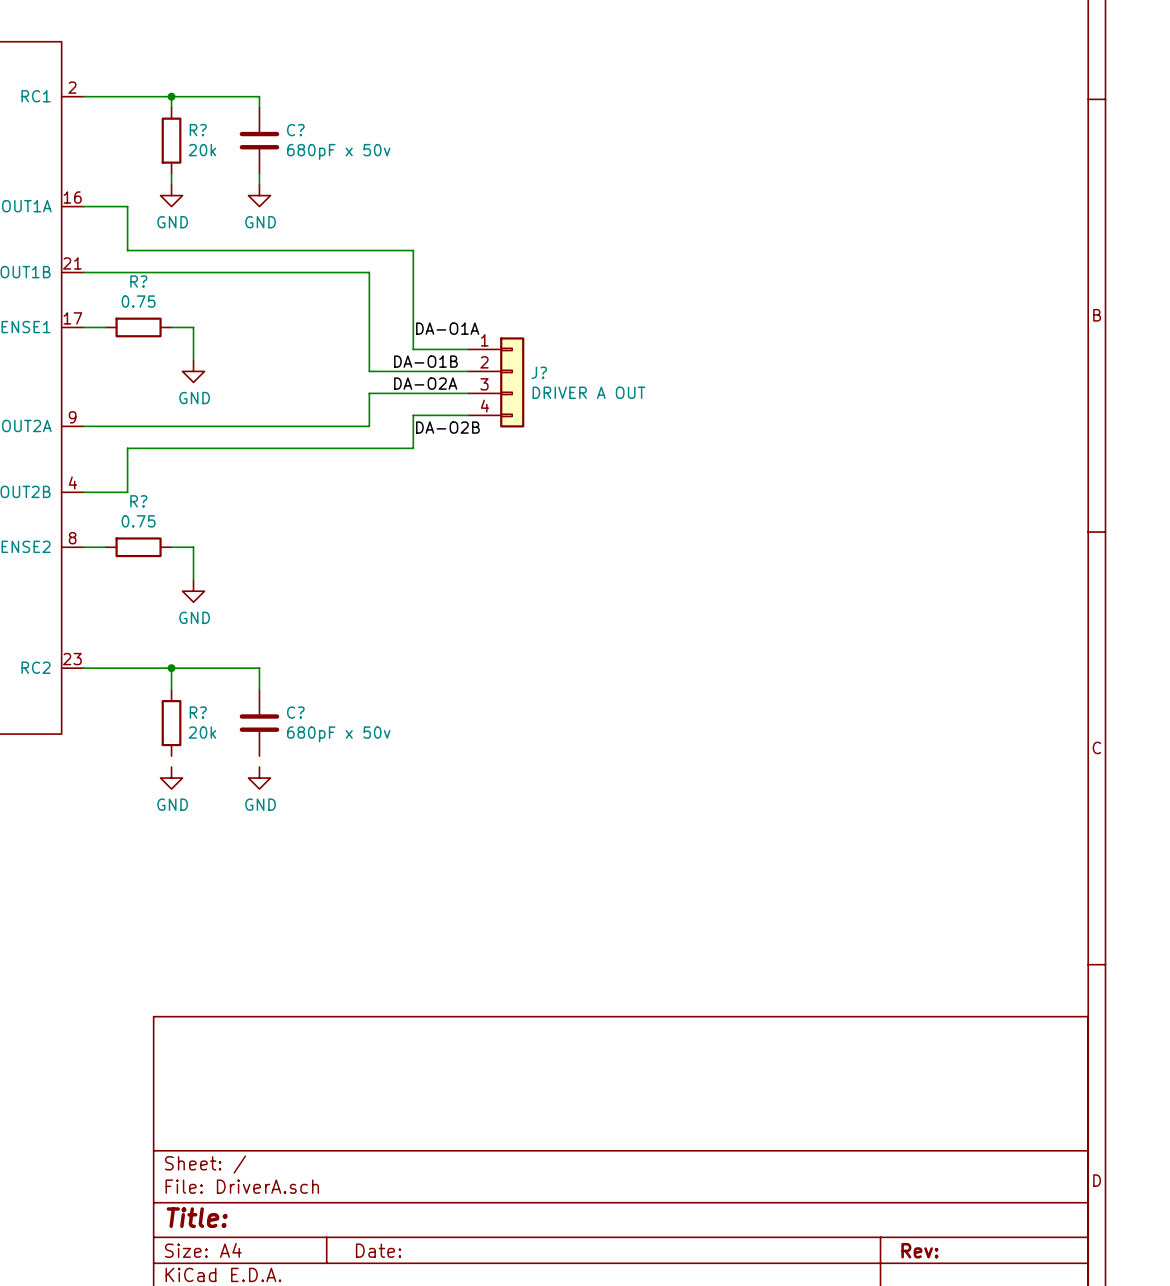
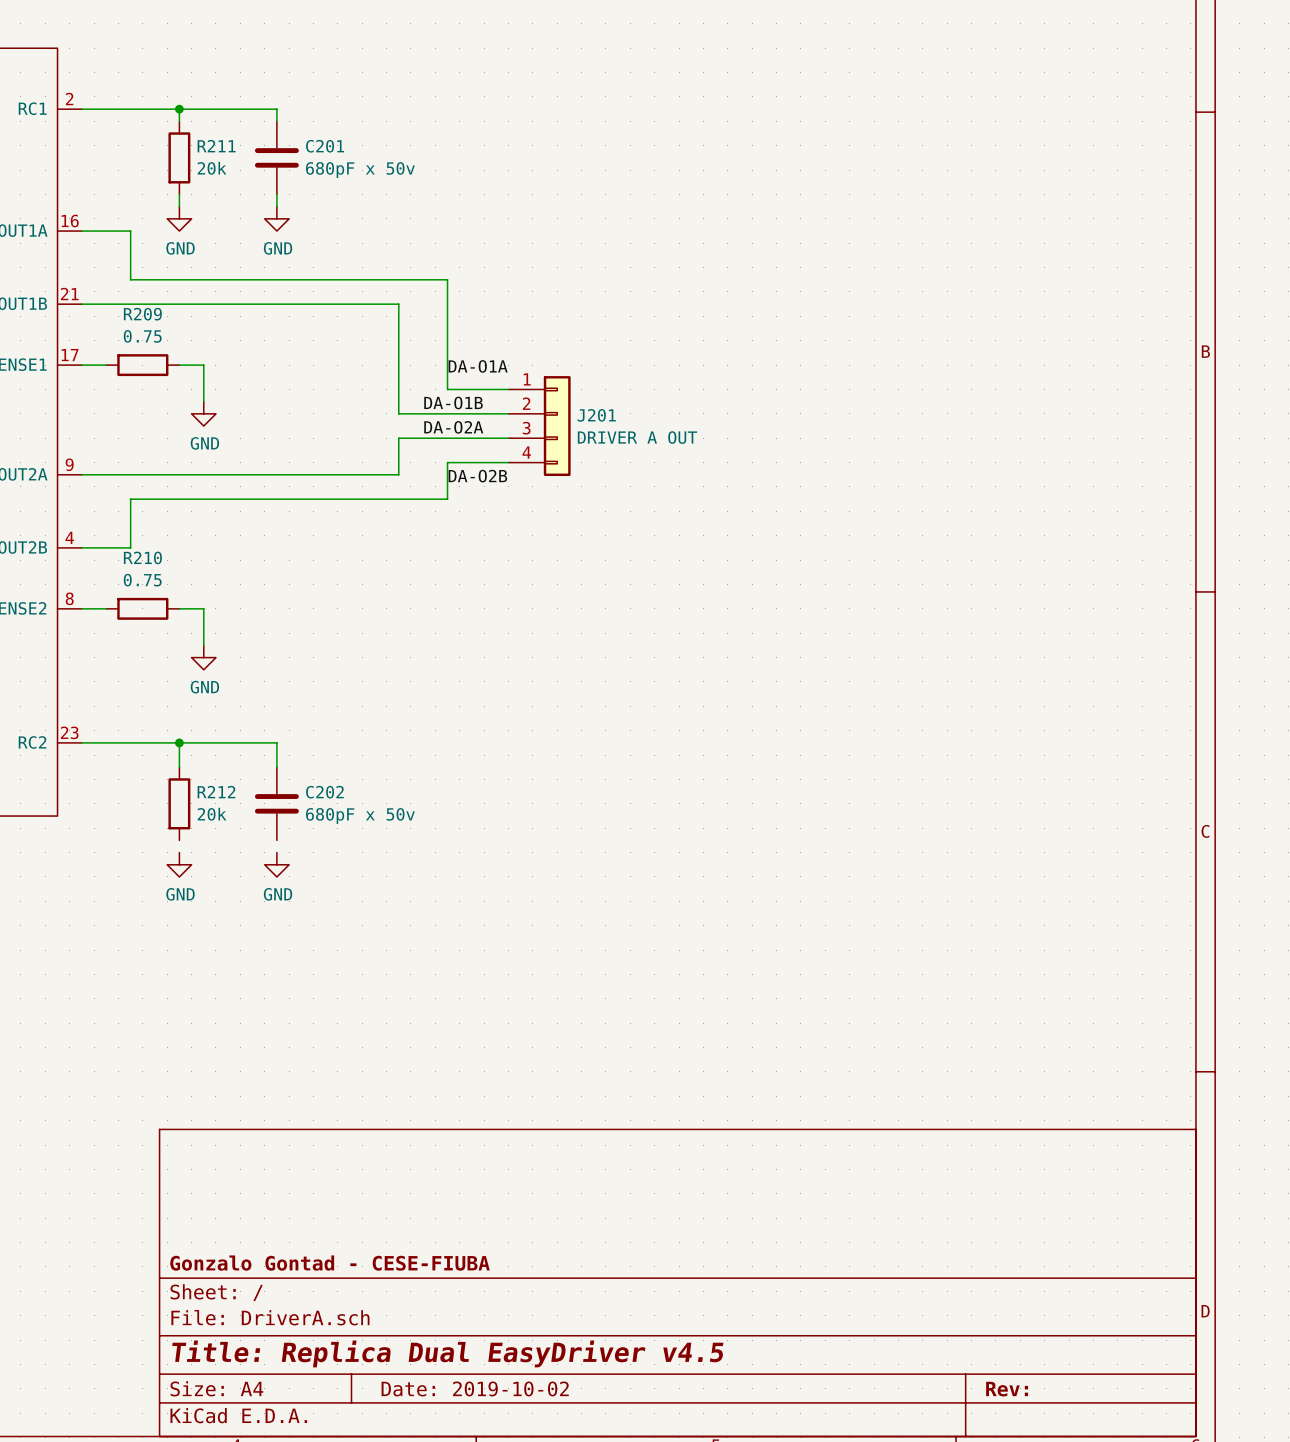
R? name: R? (198, 130) -> R211 (216, 146)
C? name: C? (295, 130) -> C201 (325, 146)
R? name: R? (138, 281) -> R209 (142, 314)
J? name: J? (539, 372) -> J201 (596, 415)
R? name: R? (138, 501) -> R210 (142, 557)
R? name: R? (198, 712) -> R212 (216, 792)
C? name: C? (295, 712) -> C202 (324, 792)
title block: none -> Gonzalo Gontad - CESE-FIUBA (330, 1263)
title block: Title: (197, 1217) -> Title: Replica Dual EasyDriver v4.5 (447, 1353)
title block: Date: (378, 1250) -> Date: 2019-10-02 (475, 1388)

